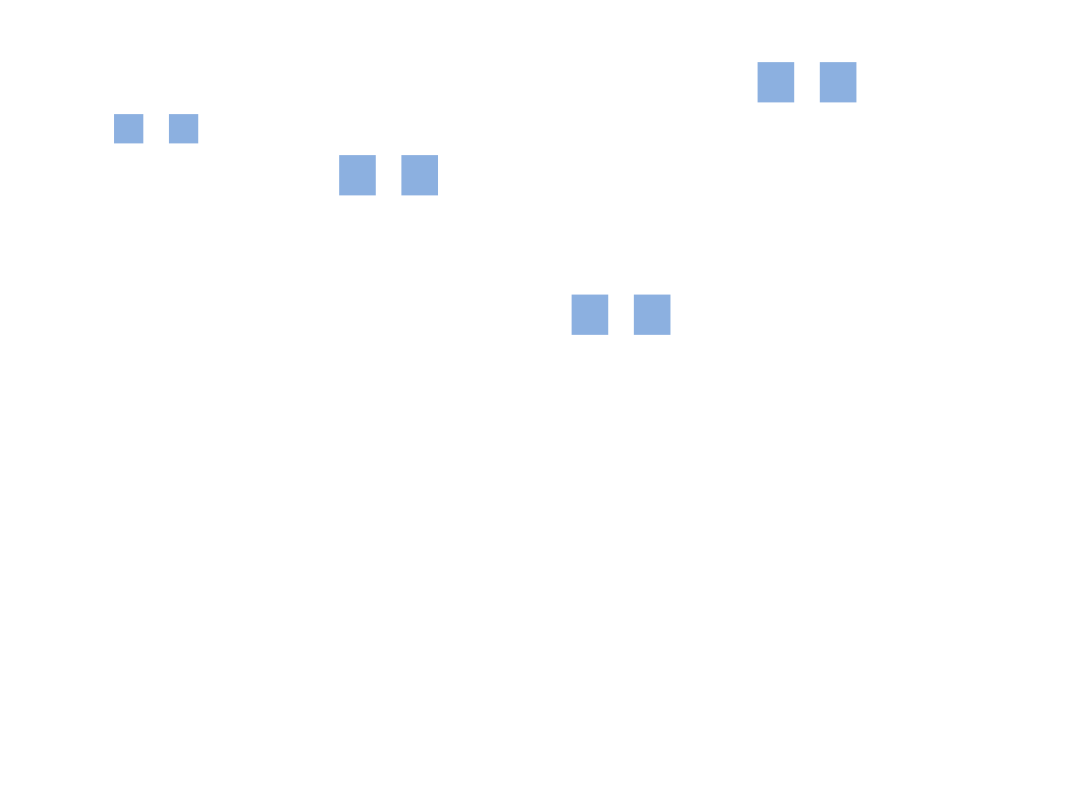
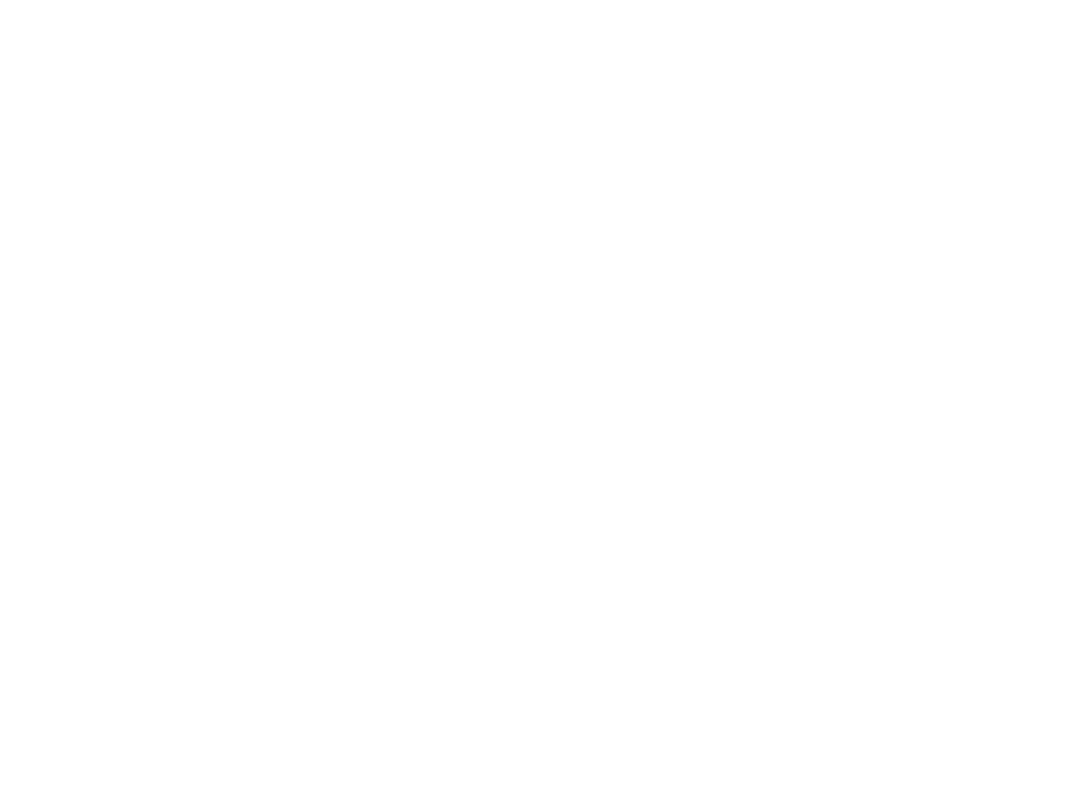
part: (807, 82) -> none
part: (156, 128) -> none
part: (388, 175) -> none
part: (621, 314) -> none

